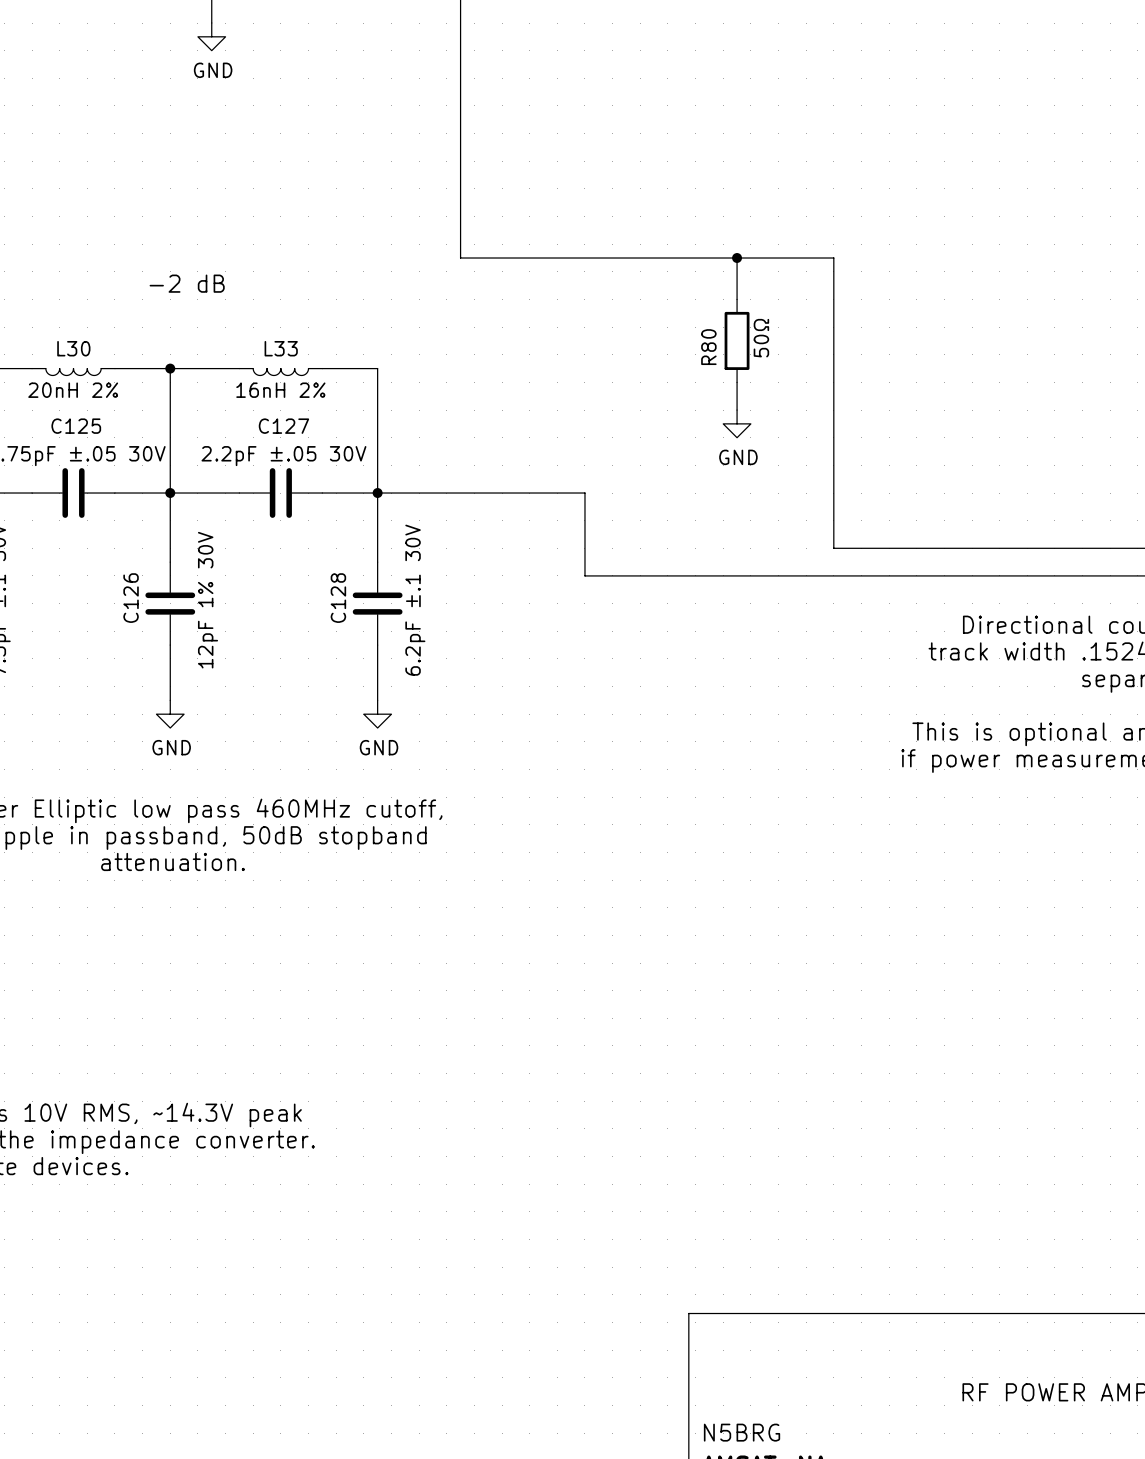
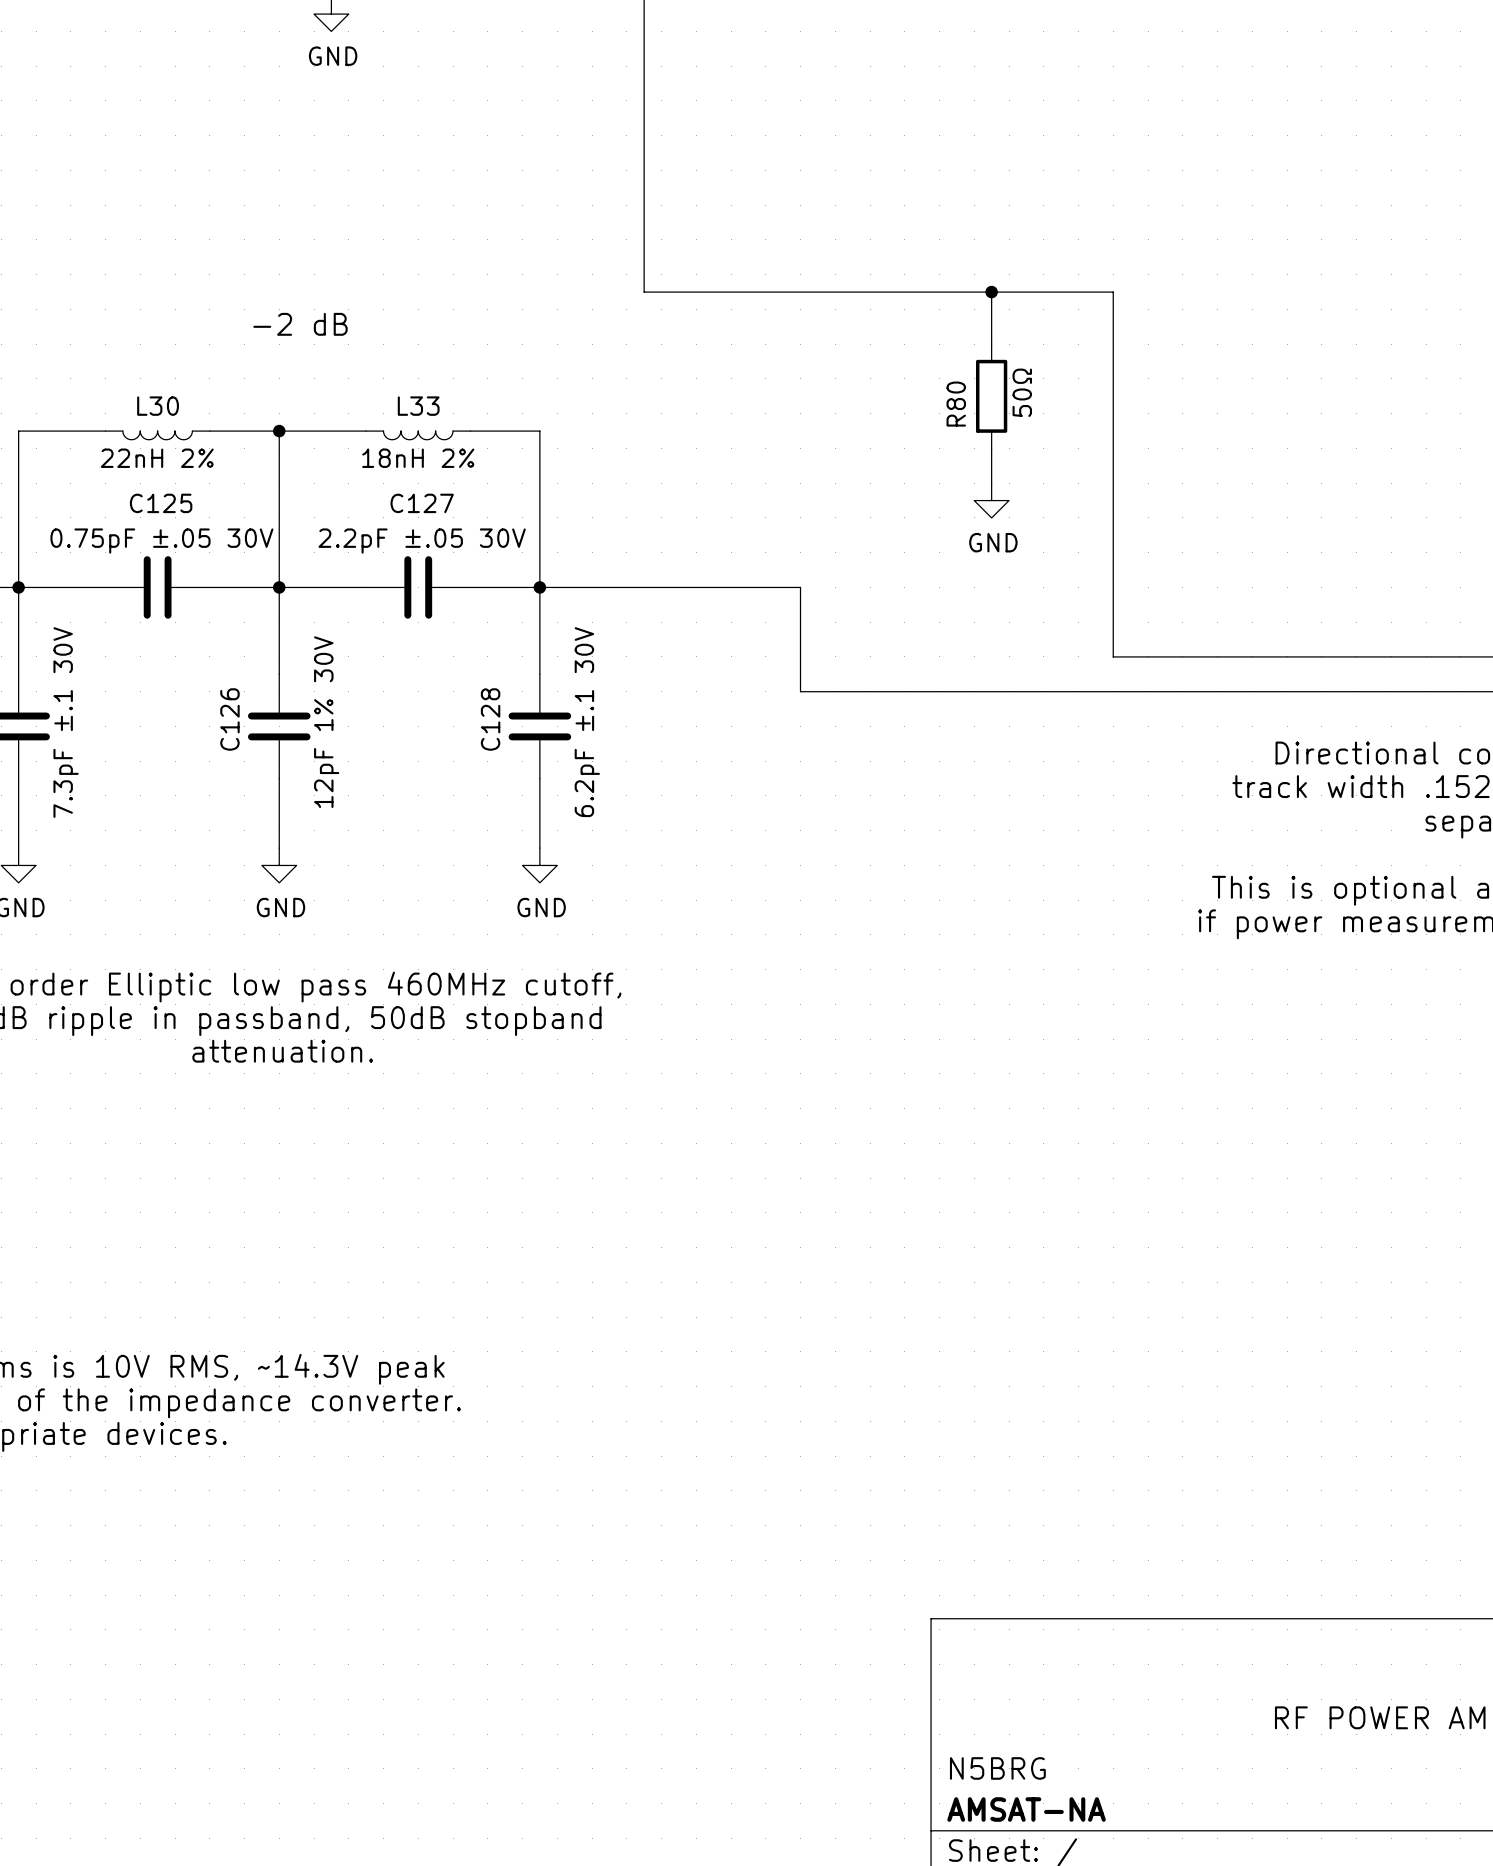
L30 value: 20nH 2% (73, 390) -> 22nH 2% (157, 458)
L33 value: 16nH 2% (280, 390) -> 18nH 2% (418, 458)

